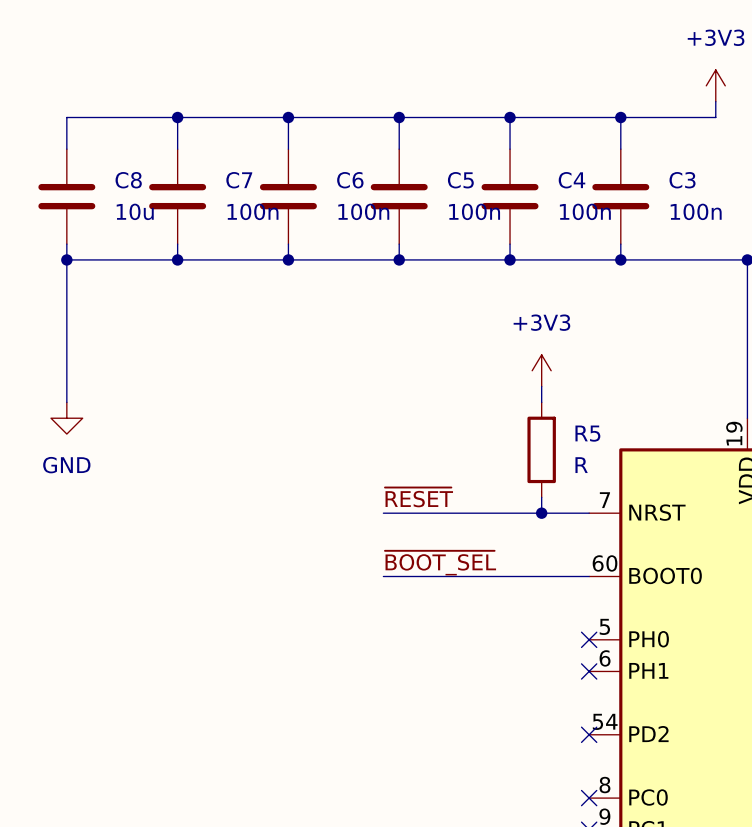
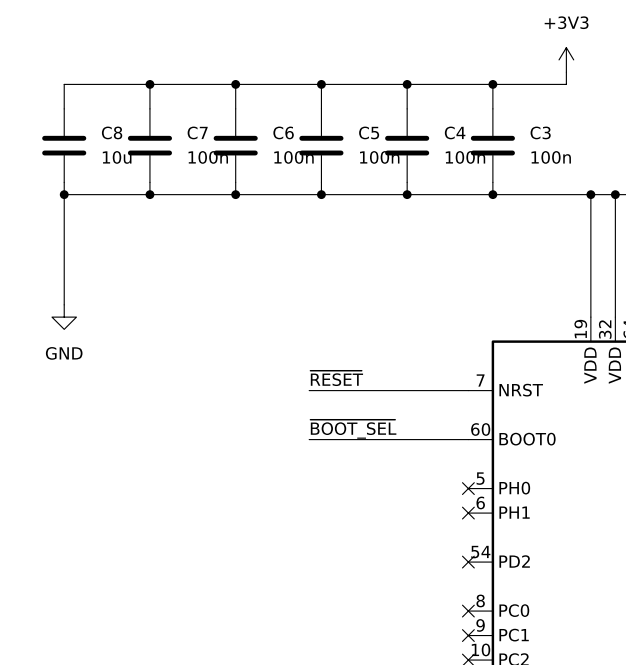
power symbol: +3V3 (541, 370) -> none
wire: (541, 386) (541, 402) -> none
R5: R (541, 449) -> none
wire: (541, 497) (541, 513) -> none
junction: (541, 513) -> none

